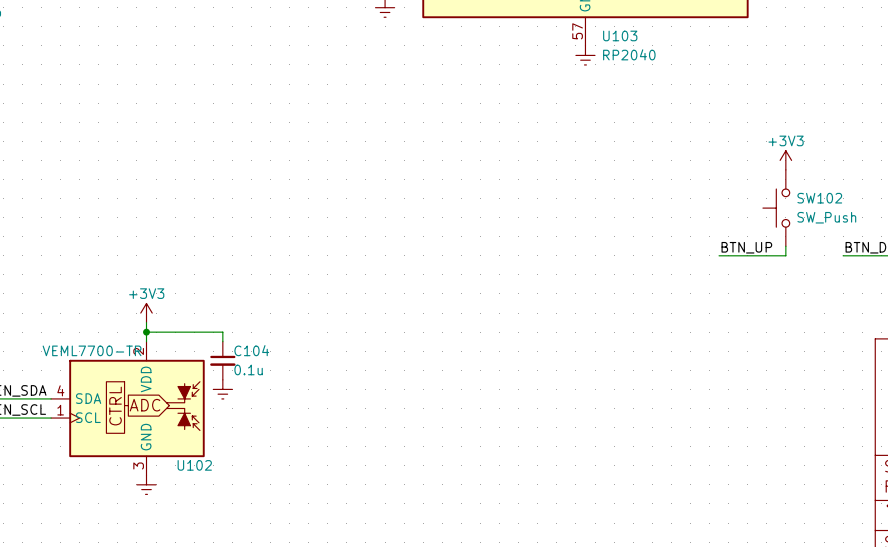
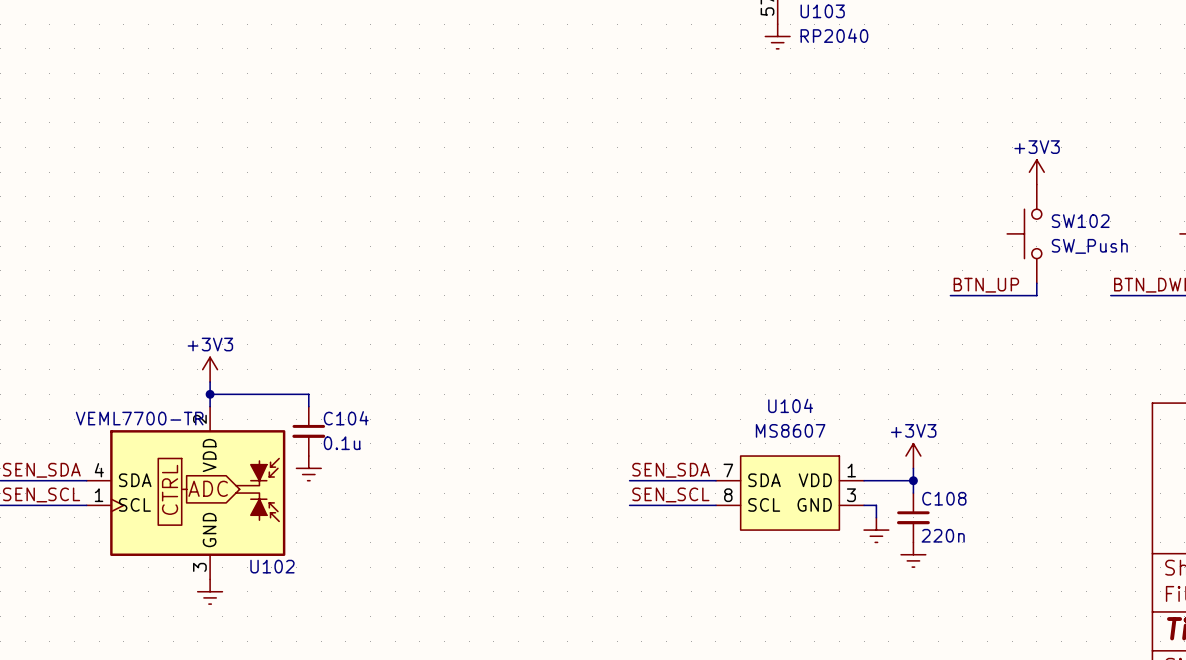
power symbol: none -> +3V3 (913, 456)
wire: none -> (913, 468) (913, 493)
label: none -> SEN_SDA (671, 470)
wire: none -> (629, 480) (715, 480)
wire: none -> (864, 480) (913, 480)
junction: none -> (913, 480)
U104: none -> MS8607 (790, 493)
label: none -> SEN_SCL (670, 494)
wire: none -> (629, 505) (715, 505)
wire: none -> (864, 505) (876, 505) (876, 517)
C108: none -> 220n (913, 517)
power symbol: none -> (876, 530)
power symbol: none -> (913, 554)

